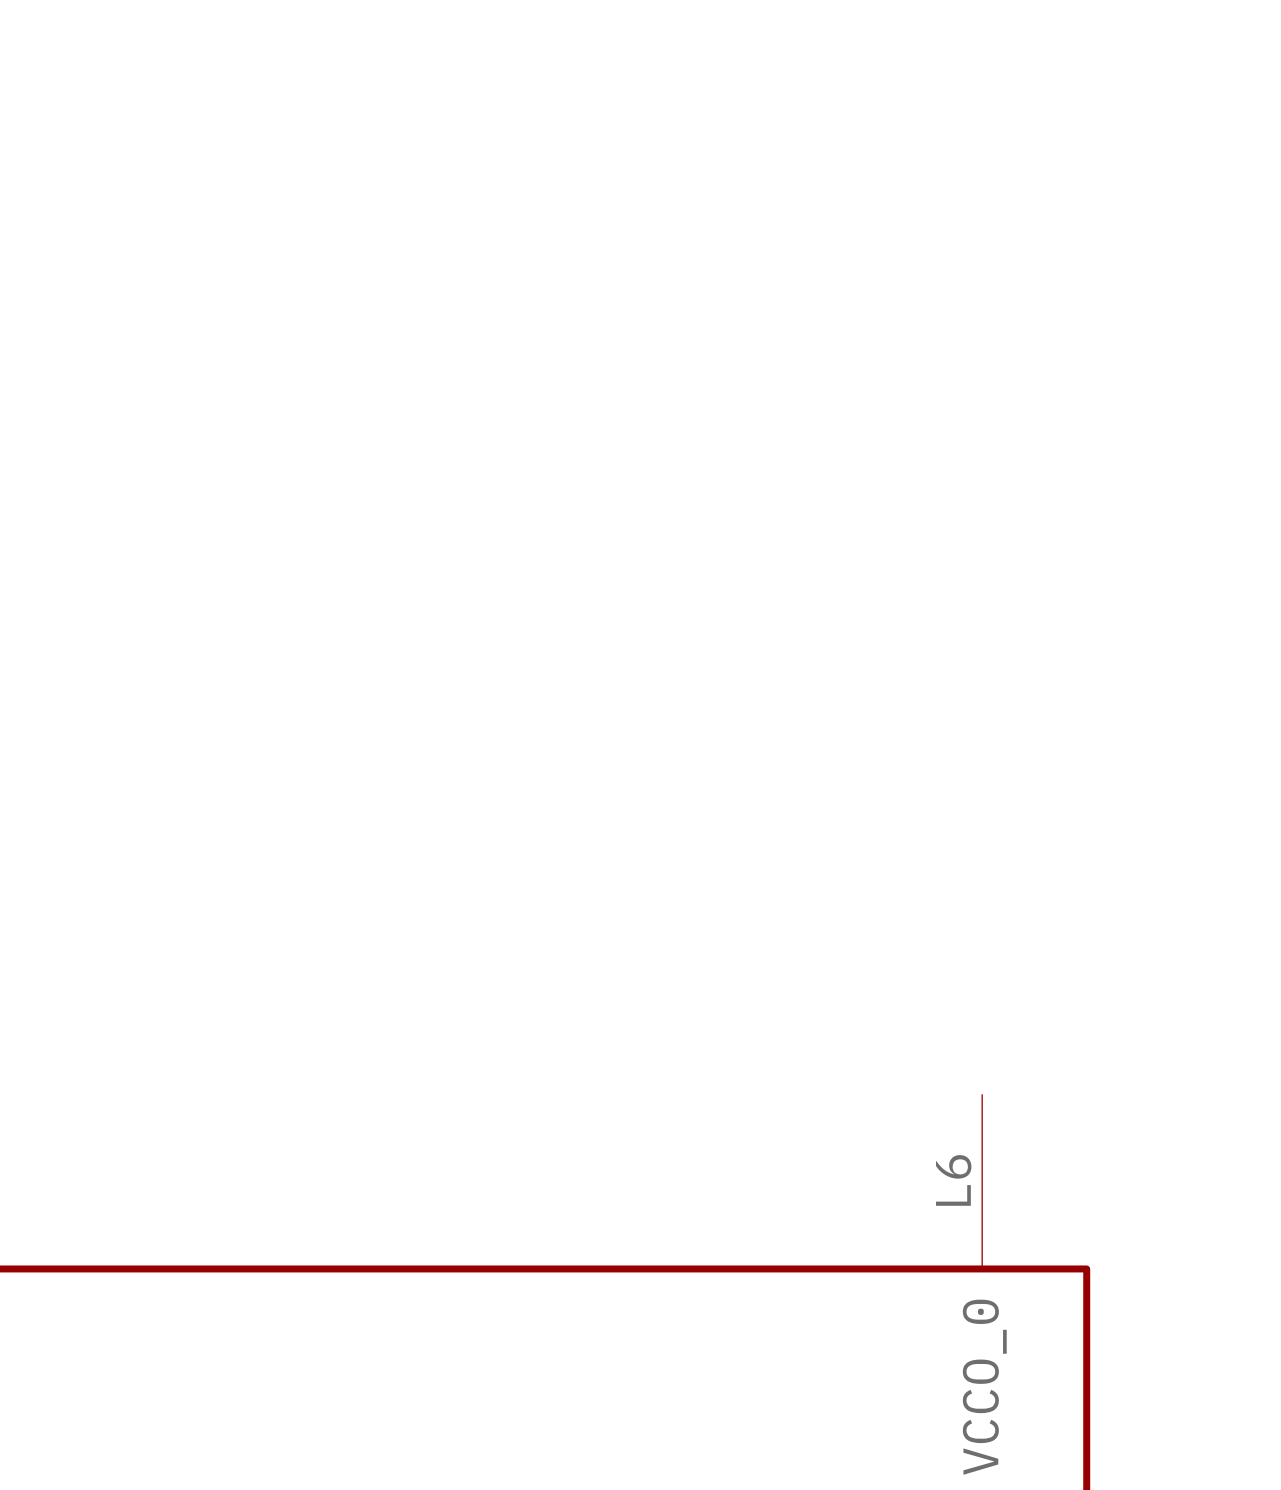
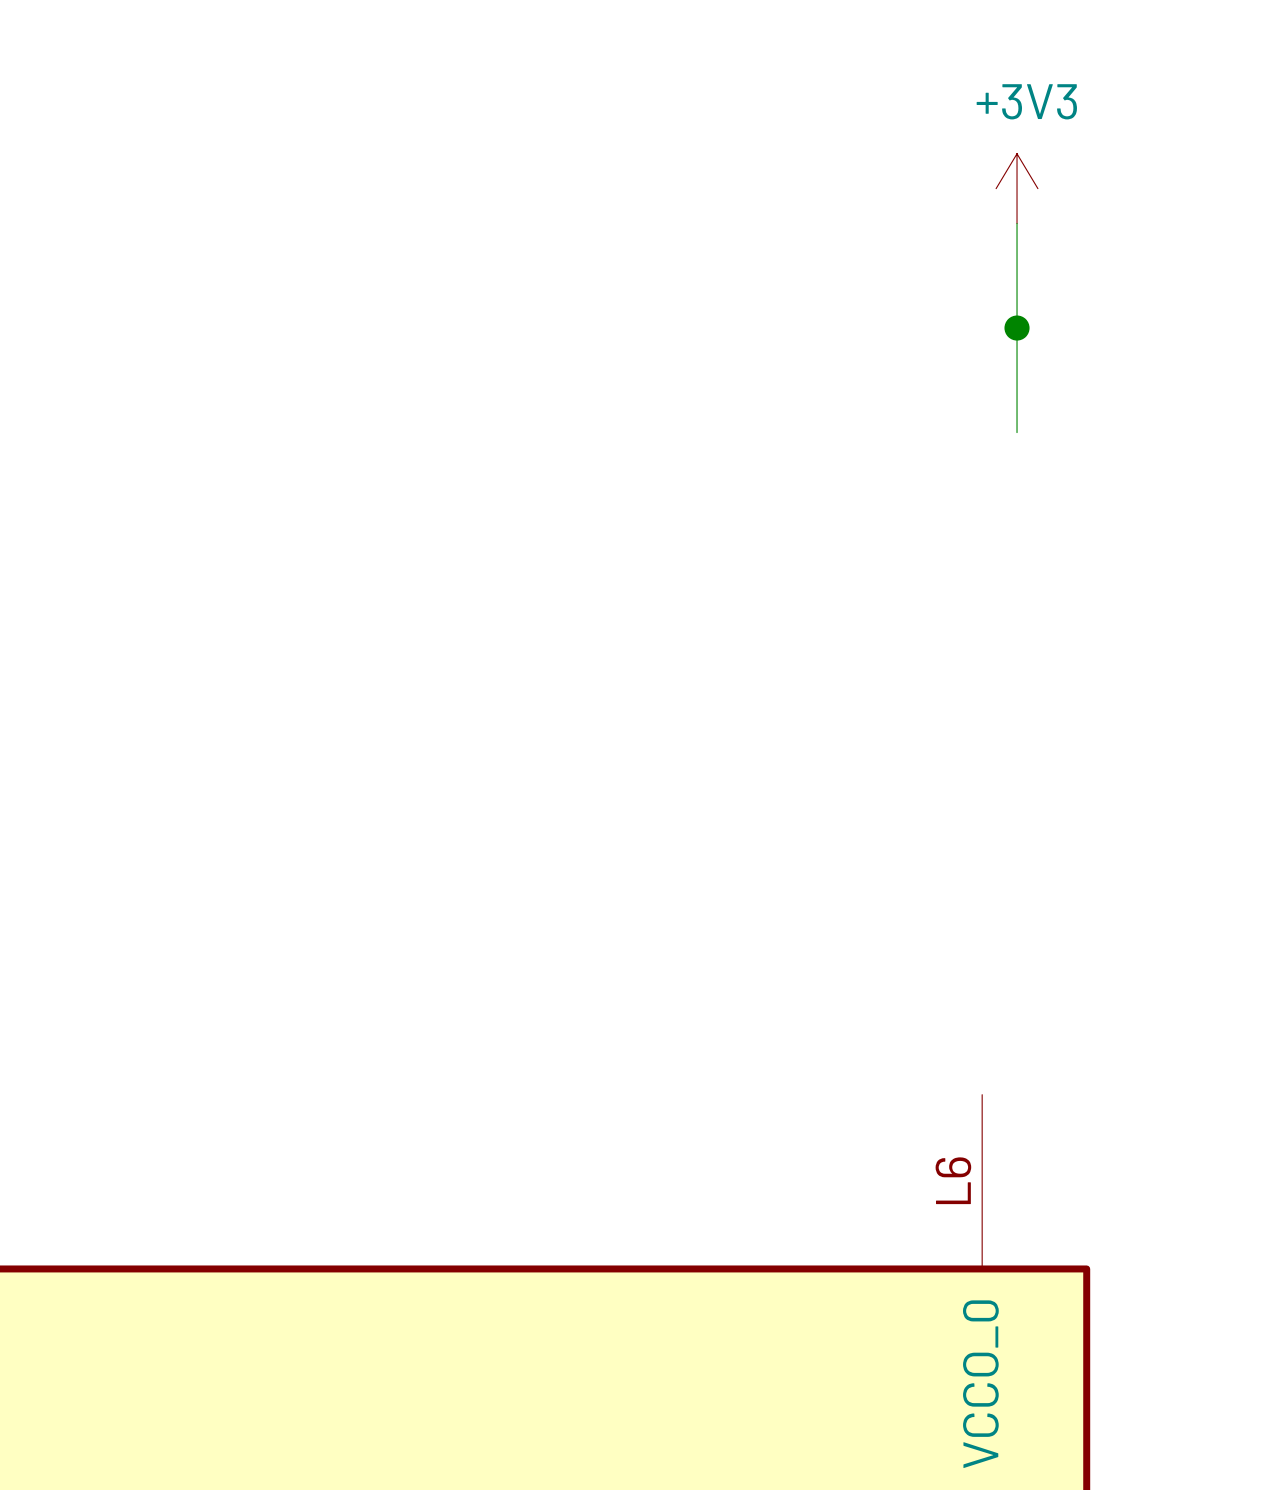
power symbol: none -> +3V3 (1017, 188)
wire: none -> (1017, 223) (1017, 432)
junction: none -> (1017, 328)

